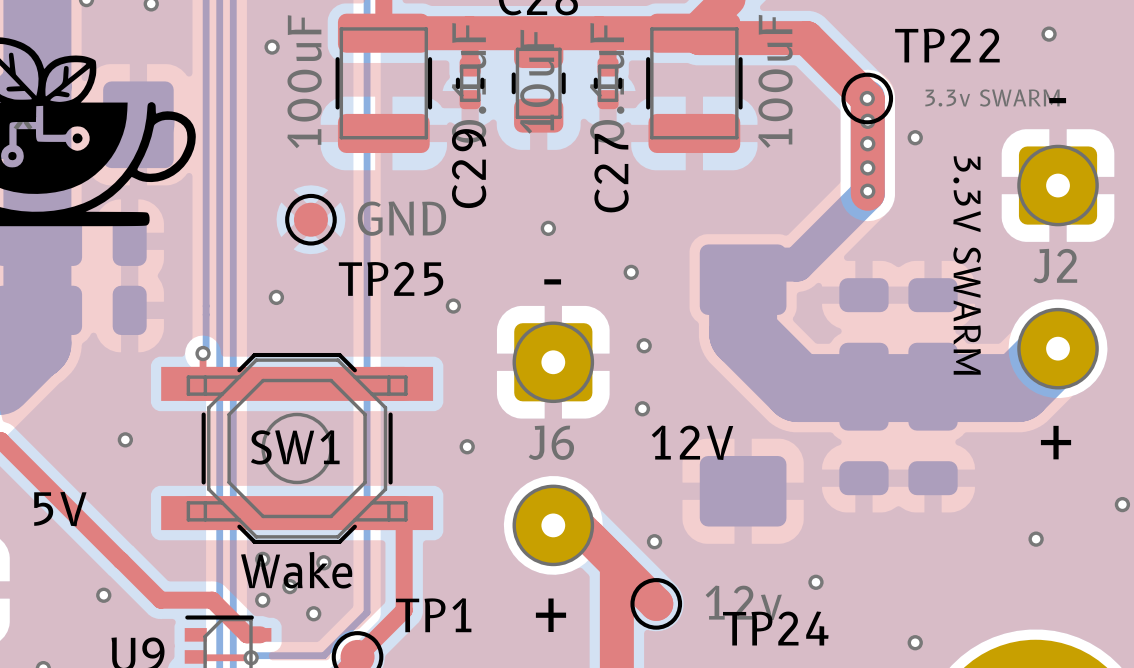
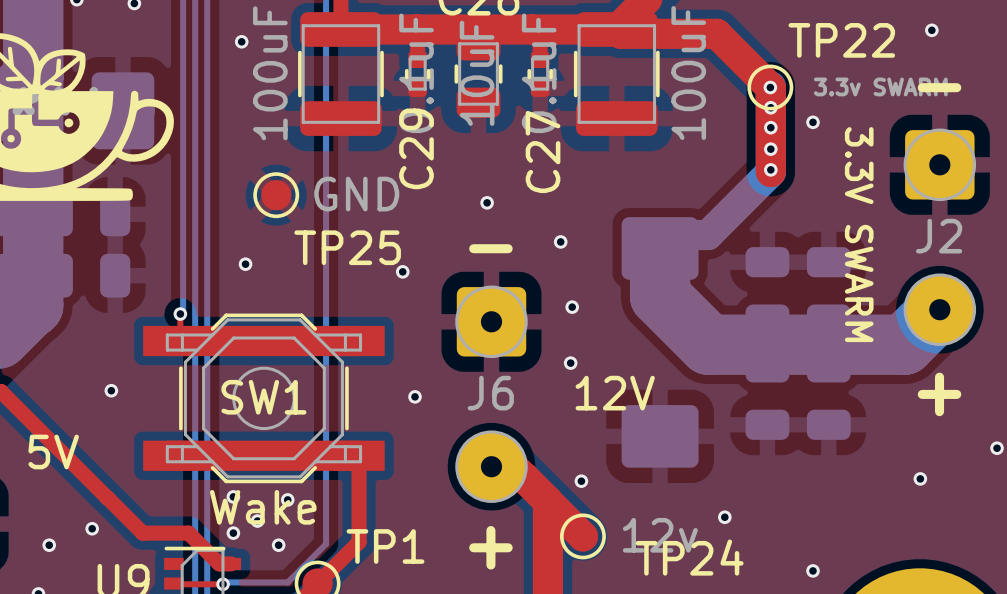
via: none -> (49, 545)

